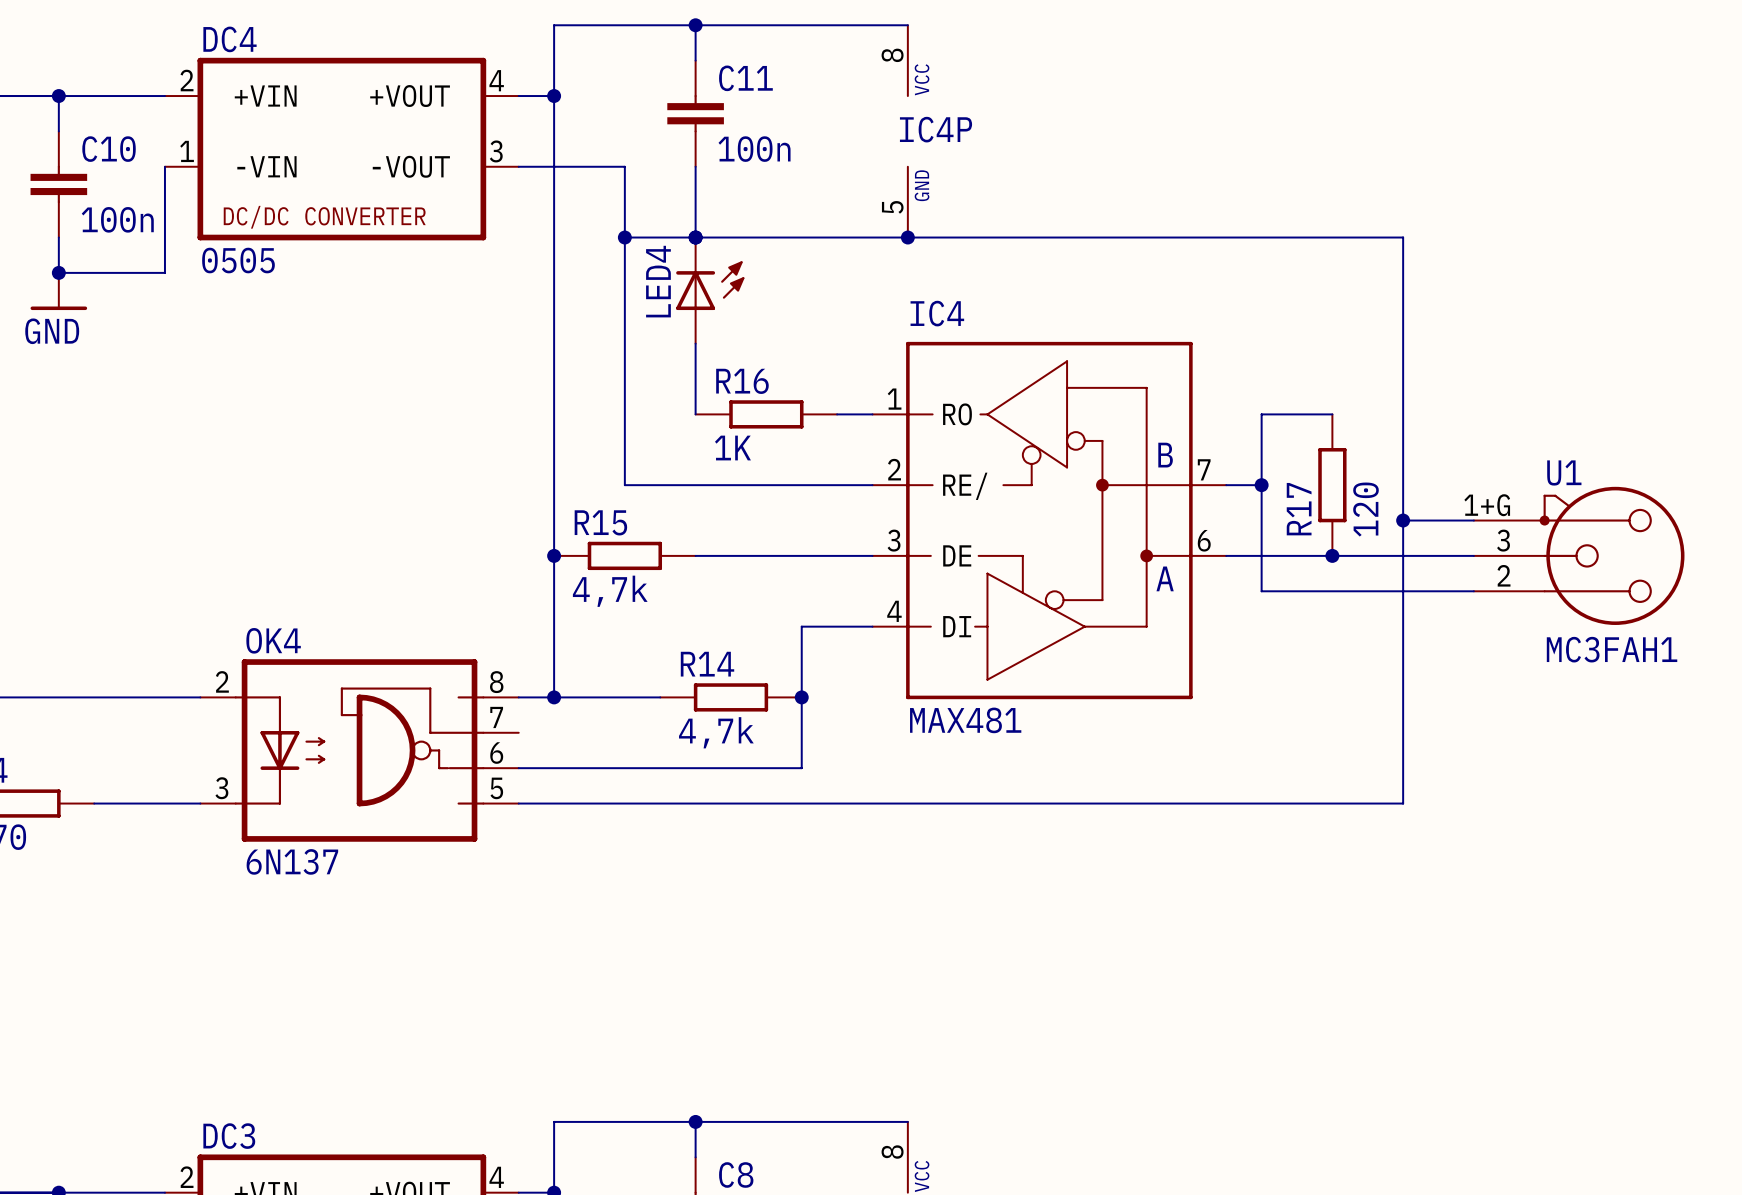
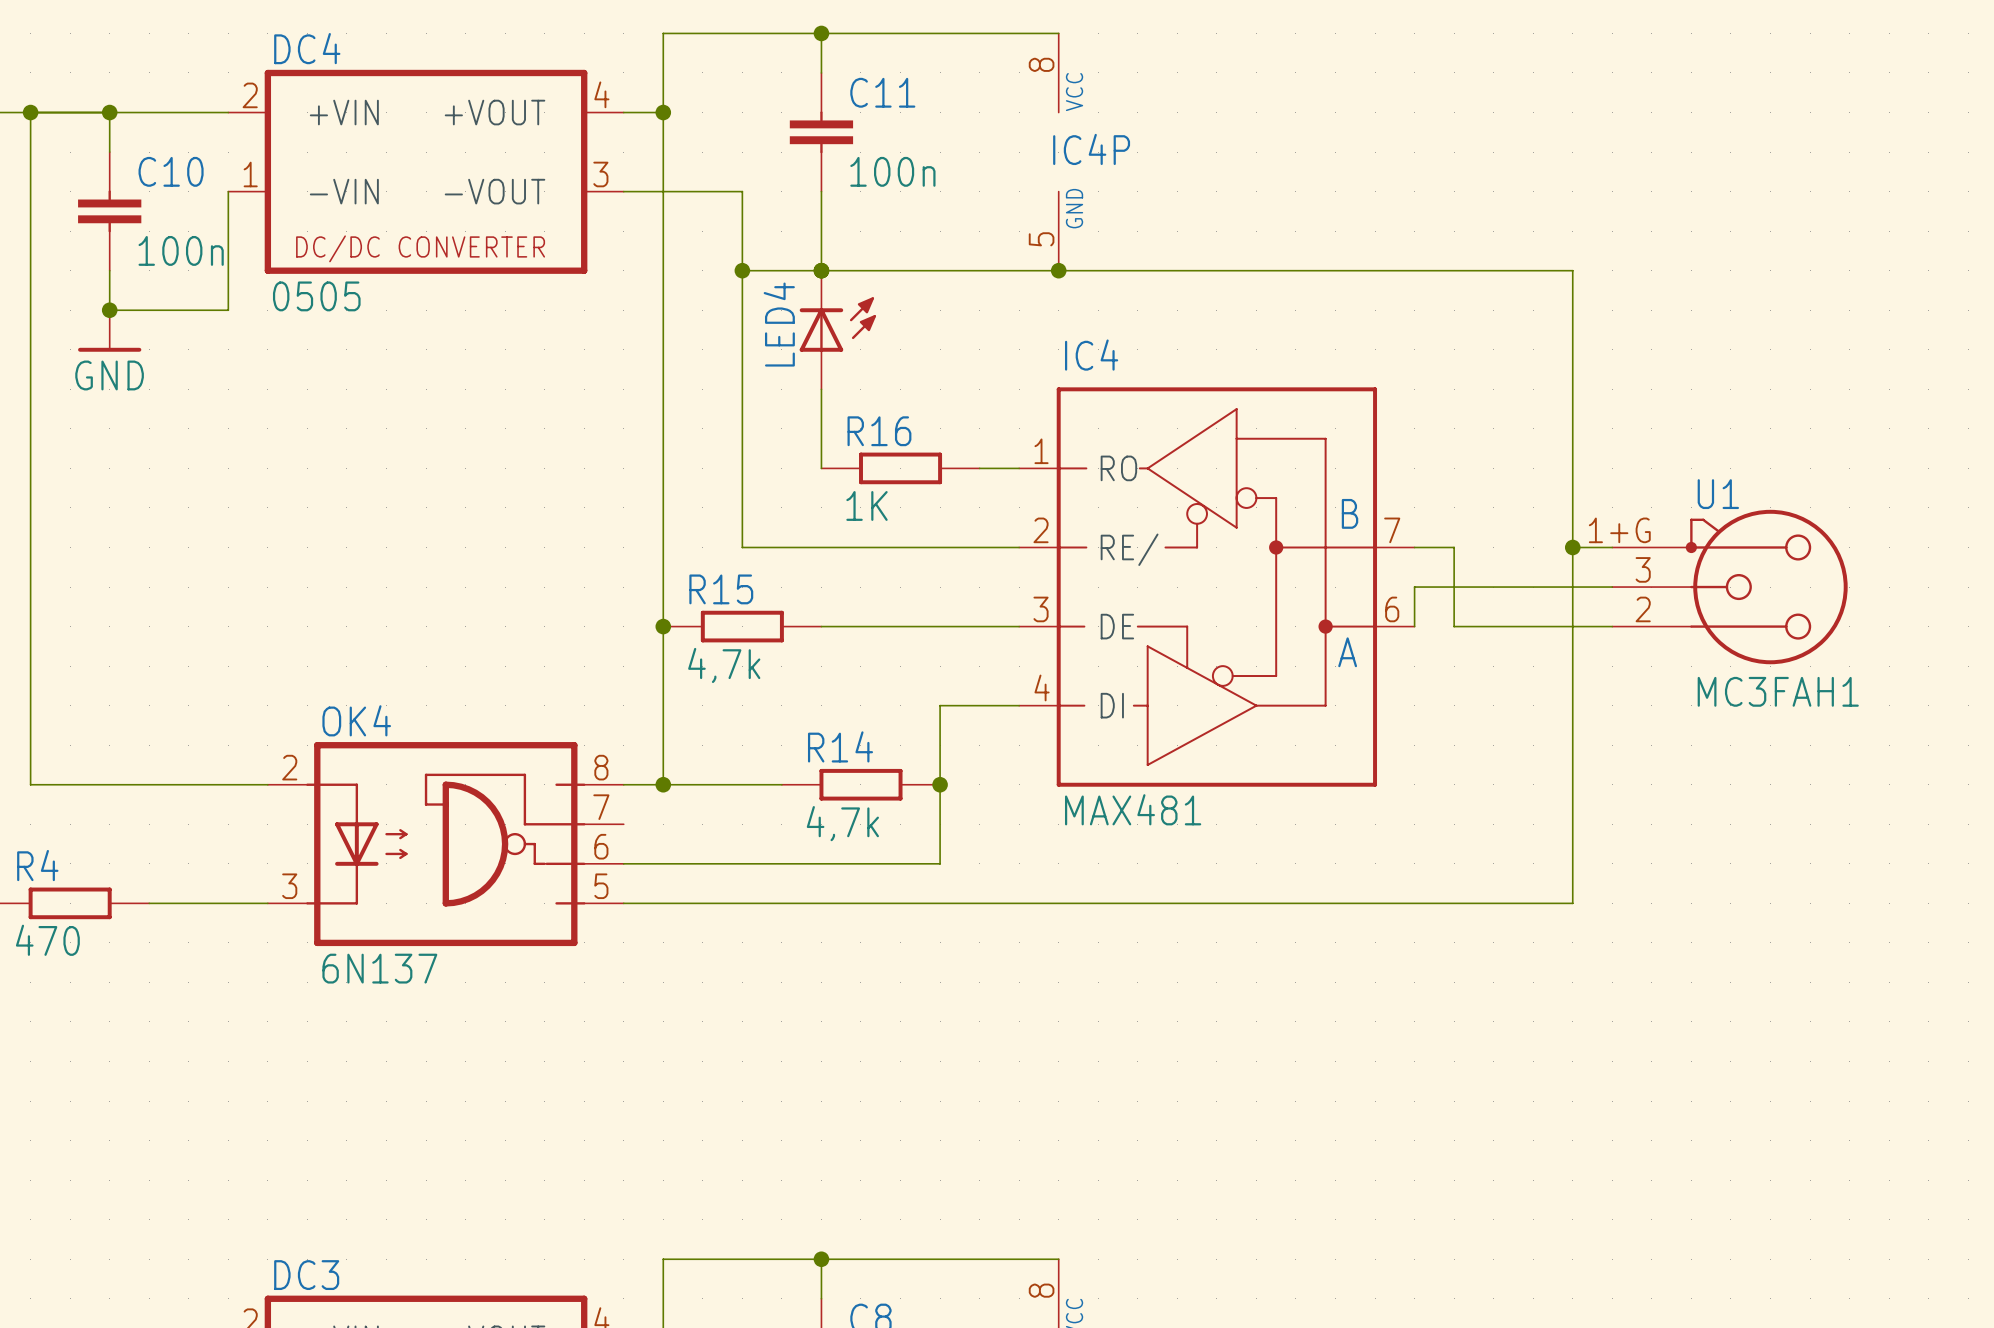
wire: (1367, 237) (1403, 237) (1403, 803) (1367, 803) -> (1572, 270) (1572, 903)
wire: (1332, 414) (1261, 414) (1261, 485) -> none
junction: (1261, 485) -> none
R17: 120 (1332, 485) -> none
wire: none -> (1572, 547) (1612, 547)
junction: none -> (1572, 547)
junction: (1403, 520) -> none
wire: (1226, 555) (1261, 555) (1261, 591) (1473, 591) -> (1414, 626) (1414, 587) (1612, 587)
junction: (1332, 555) -> none
U1 position: (1579, 555) -> (1729, 587)

